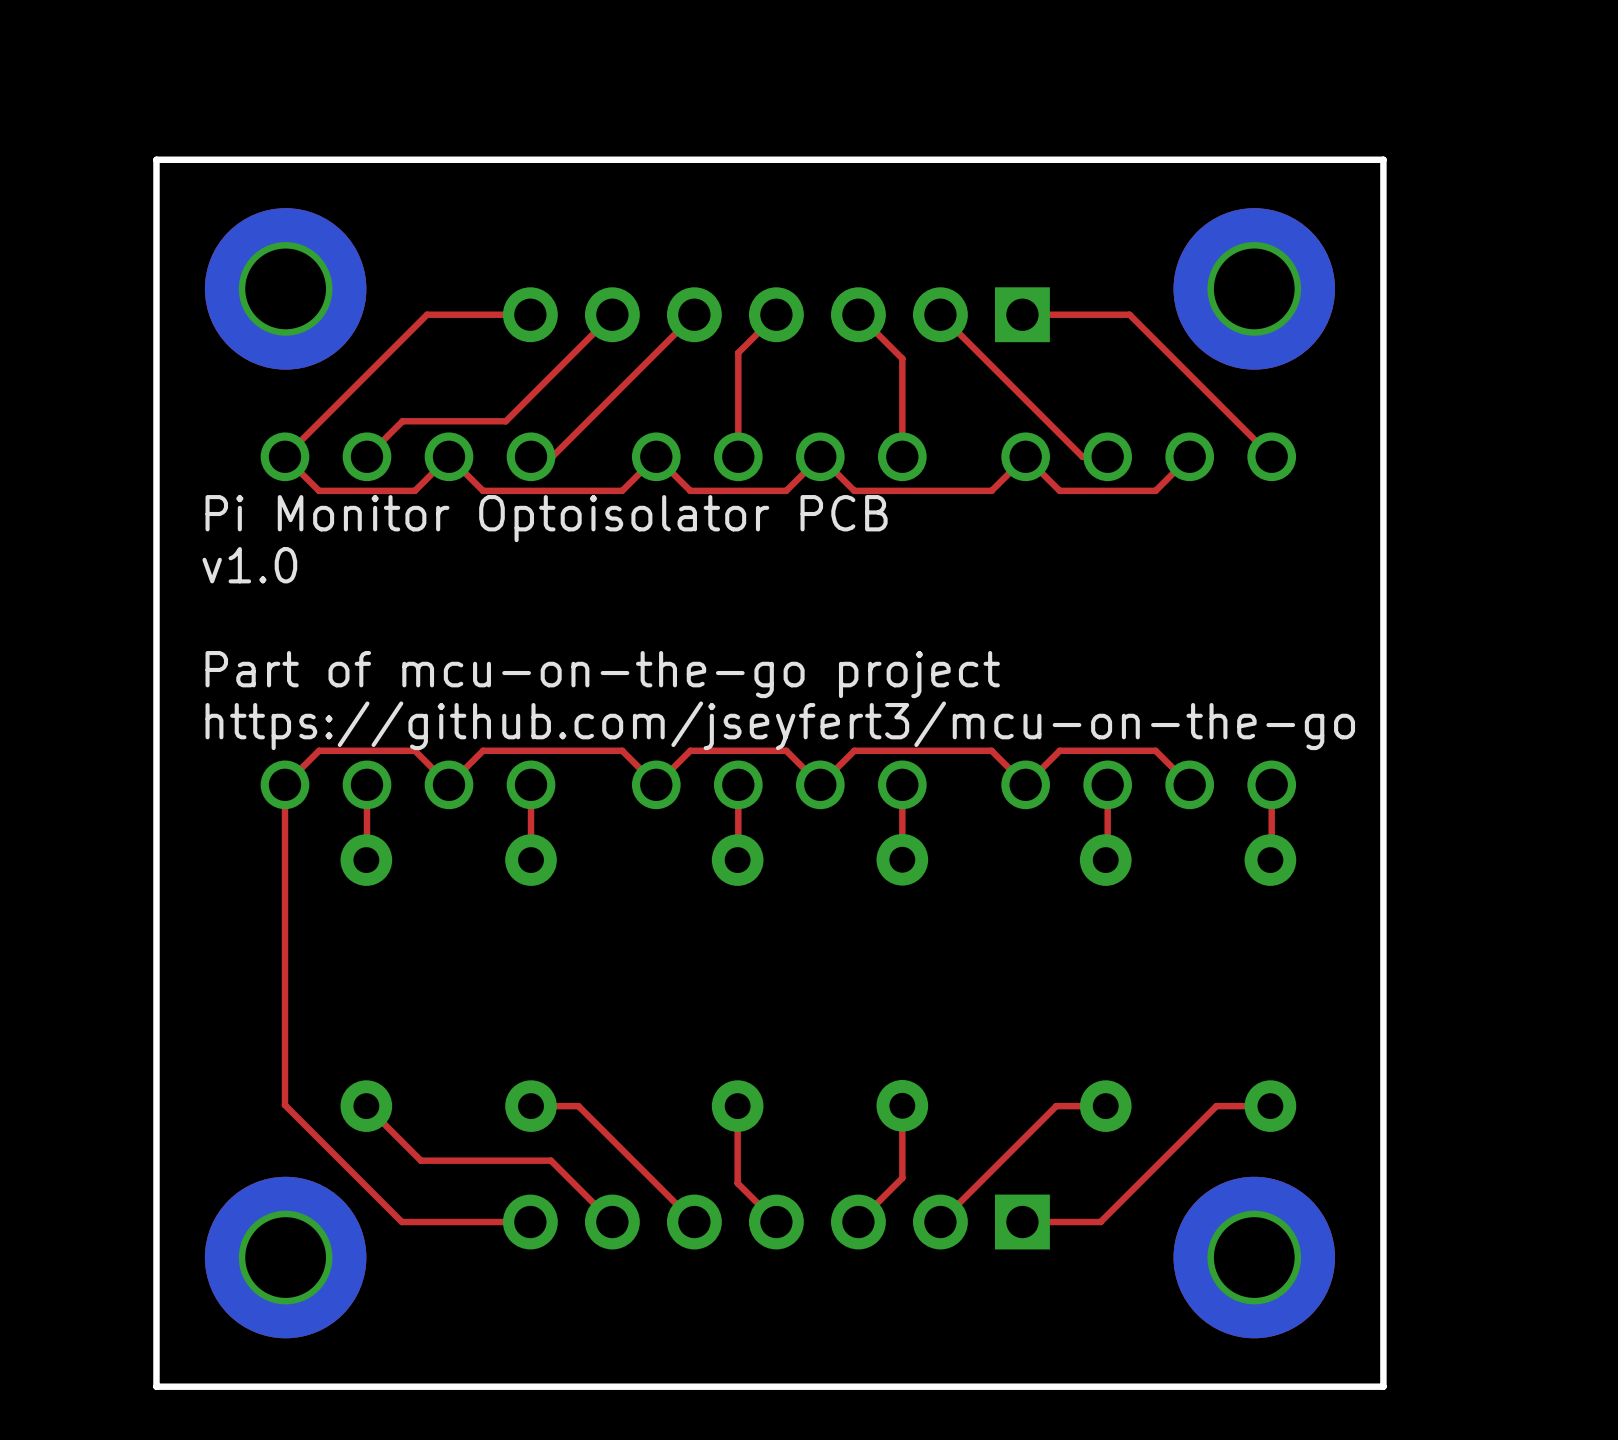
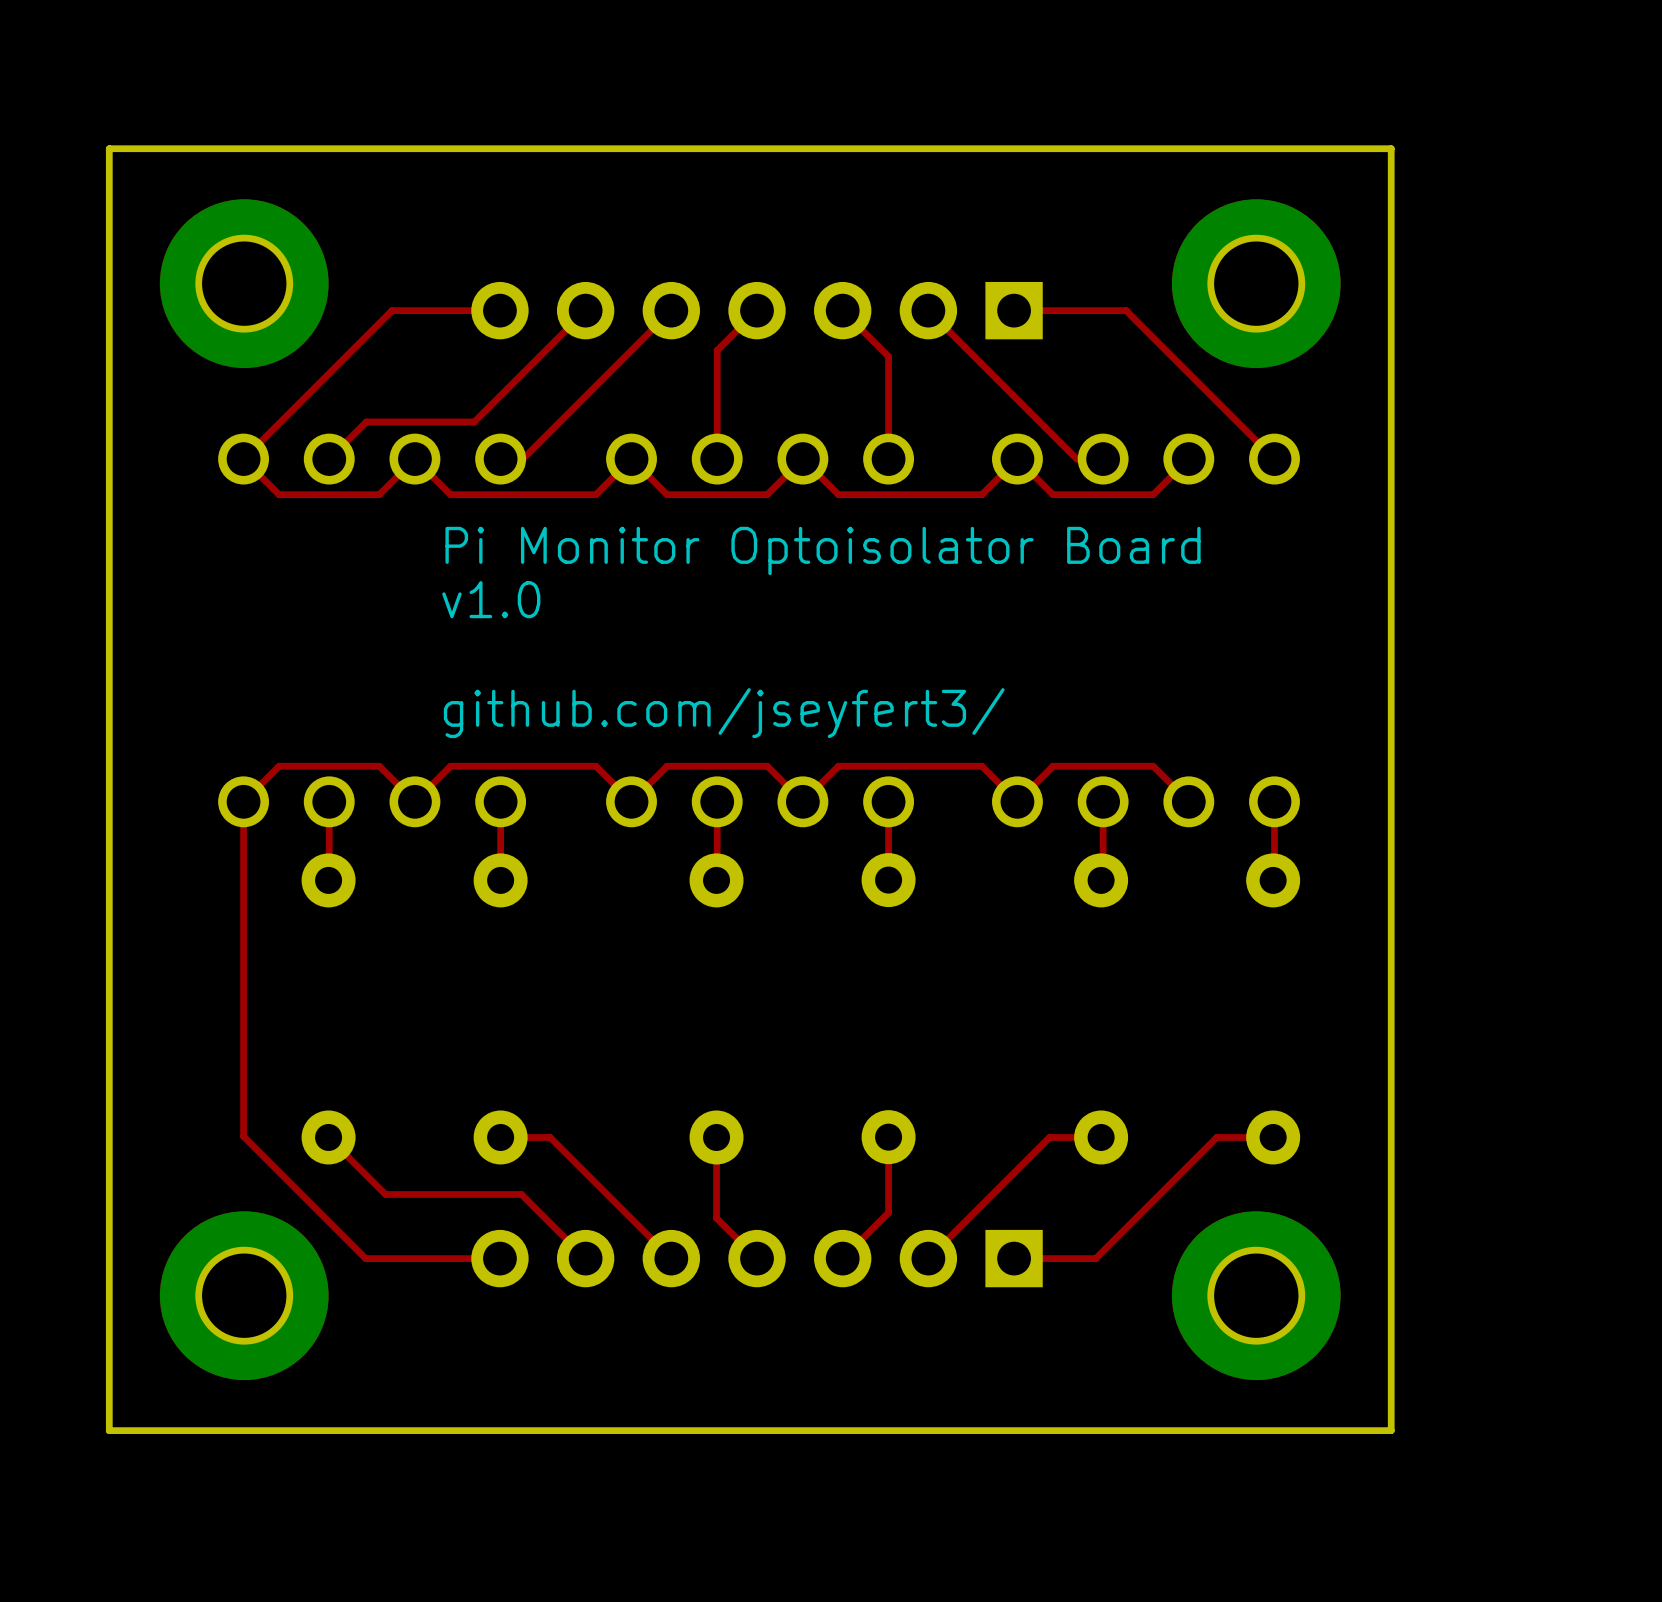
text: Pi Monitor Optoisolator PCB (546, 518) -> Pi Monitor Optoisolator Board (823, 550)
text position: v1.0 (249, 565) -> v1.0 (491, 599)
text: Part of mcu-on-the-go project (602, 674) -> none
text: https://github.com/jseyfert3/mcu-on-the-go (780, 725) -> github.com/jseyfert3/ (724, 713)

